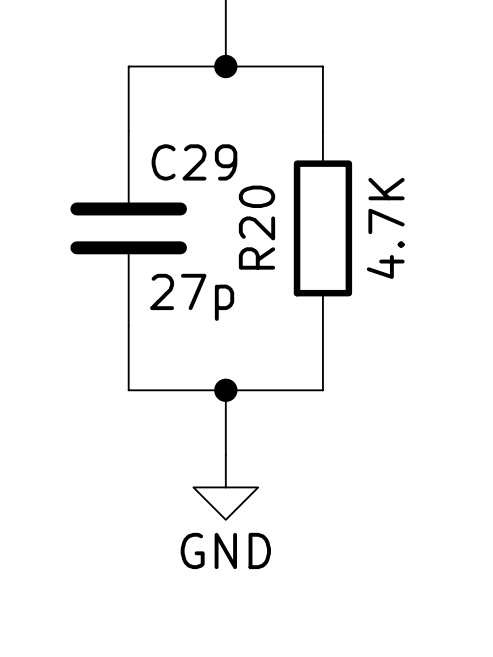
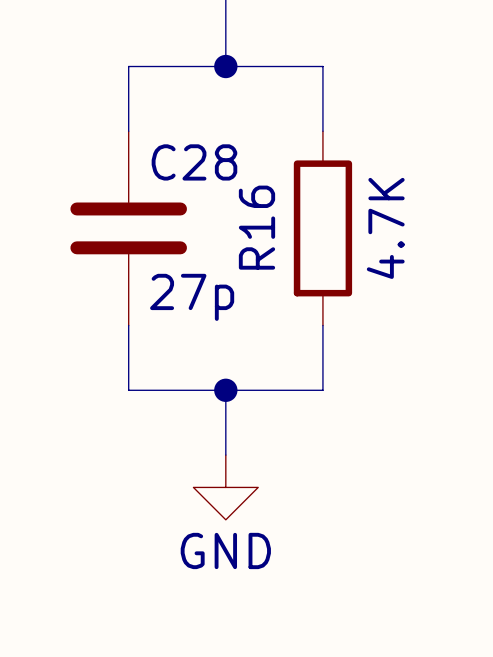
C29 name: C29 (194, 162) -> C28 (194, 162)
R20 name: R20 (256, 227) -> R16 (256, 227)

